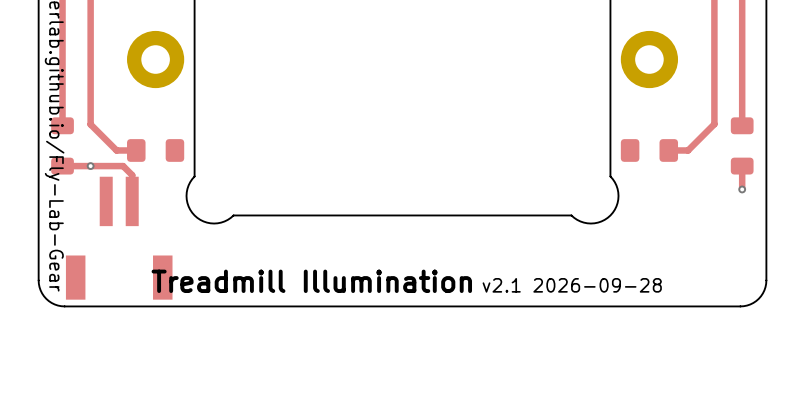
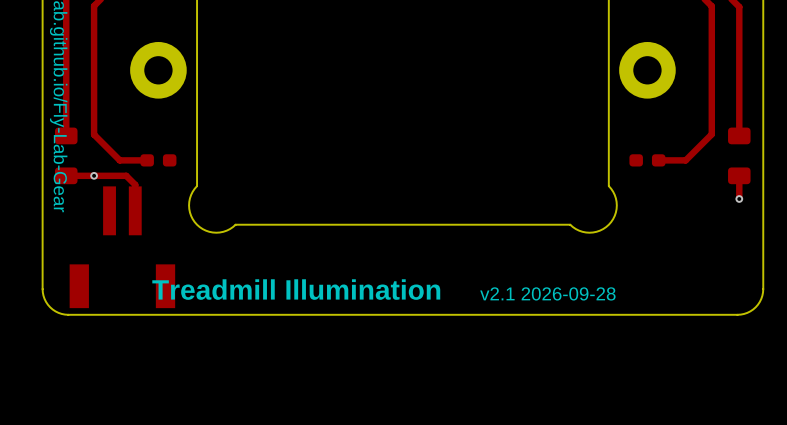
part footprint: [127, 139, 185, 162] -> [140, 154, 177, 167]
part footprint: [620, 139, 679, 162] -> [629, 154, 666, 167]

